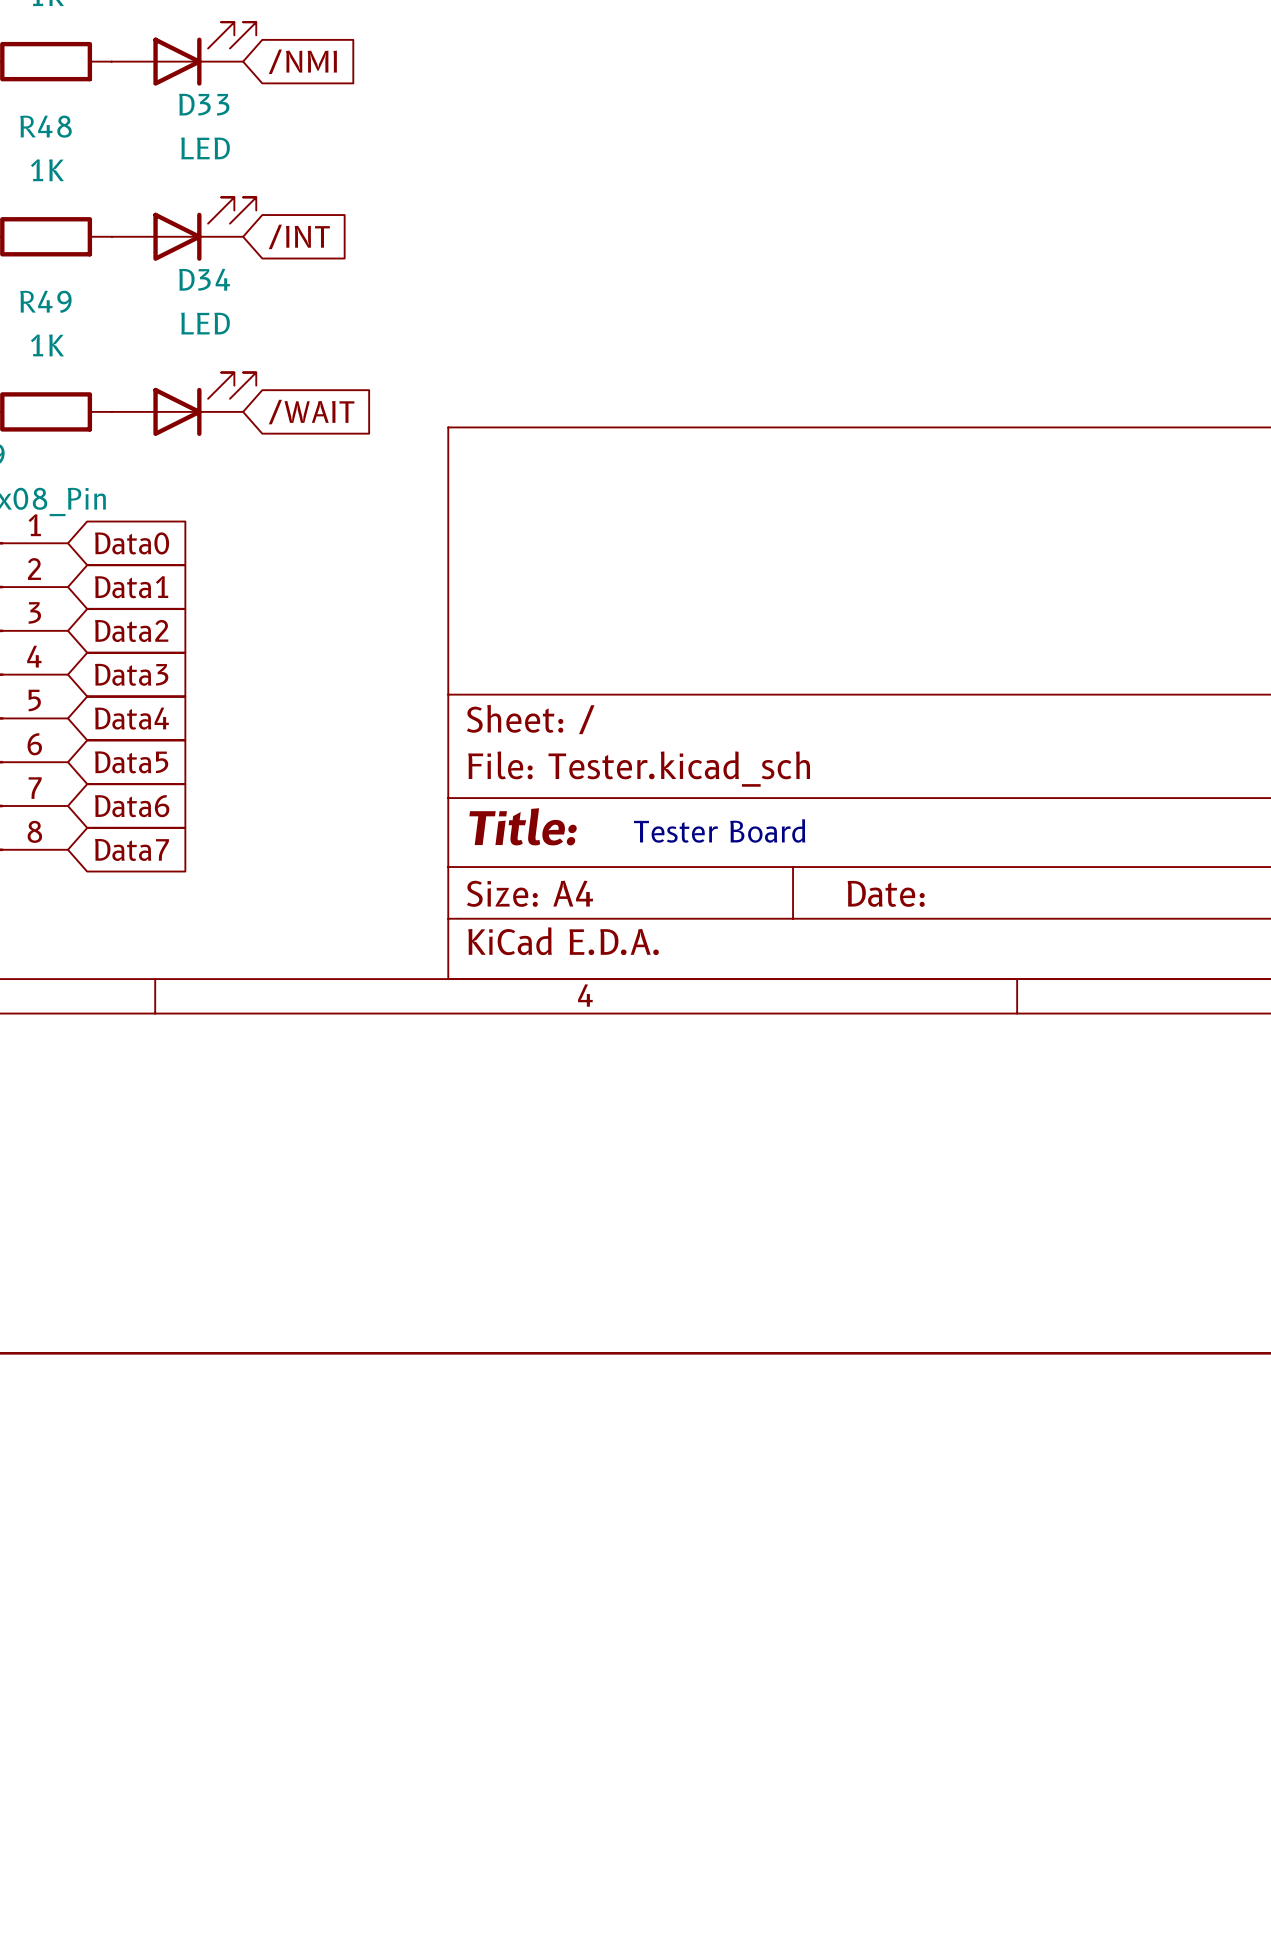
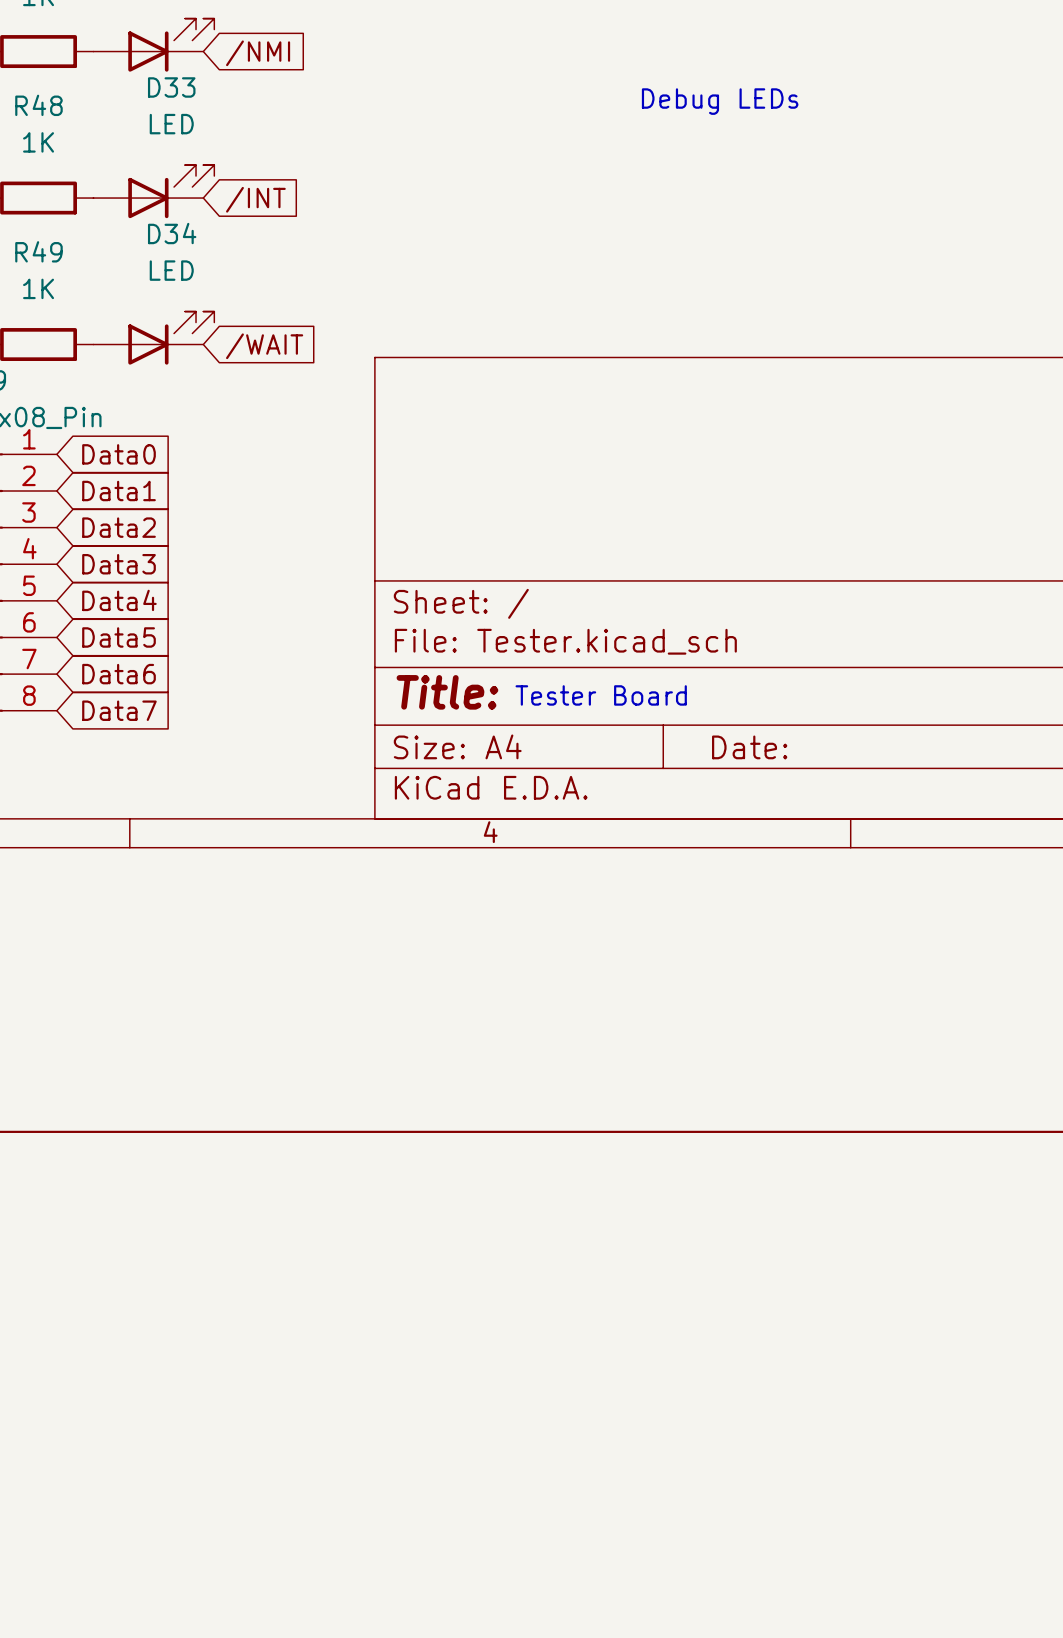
text: none -> Debug LEDs (720, 101)

